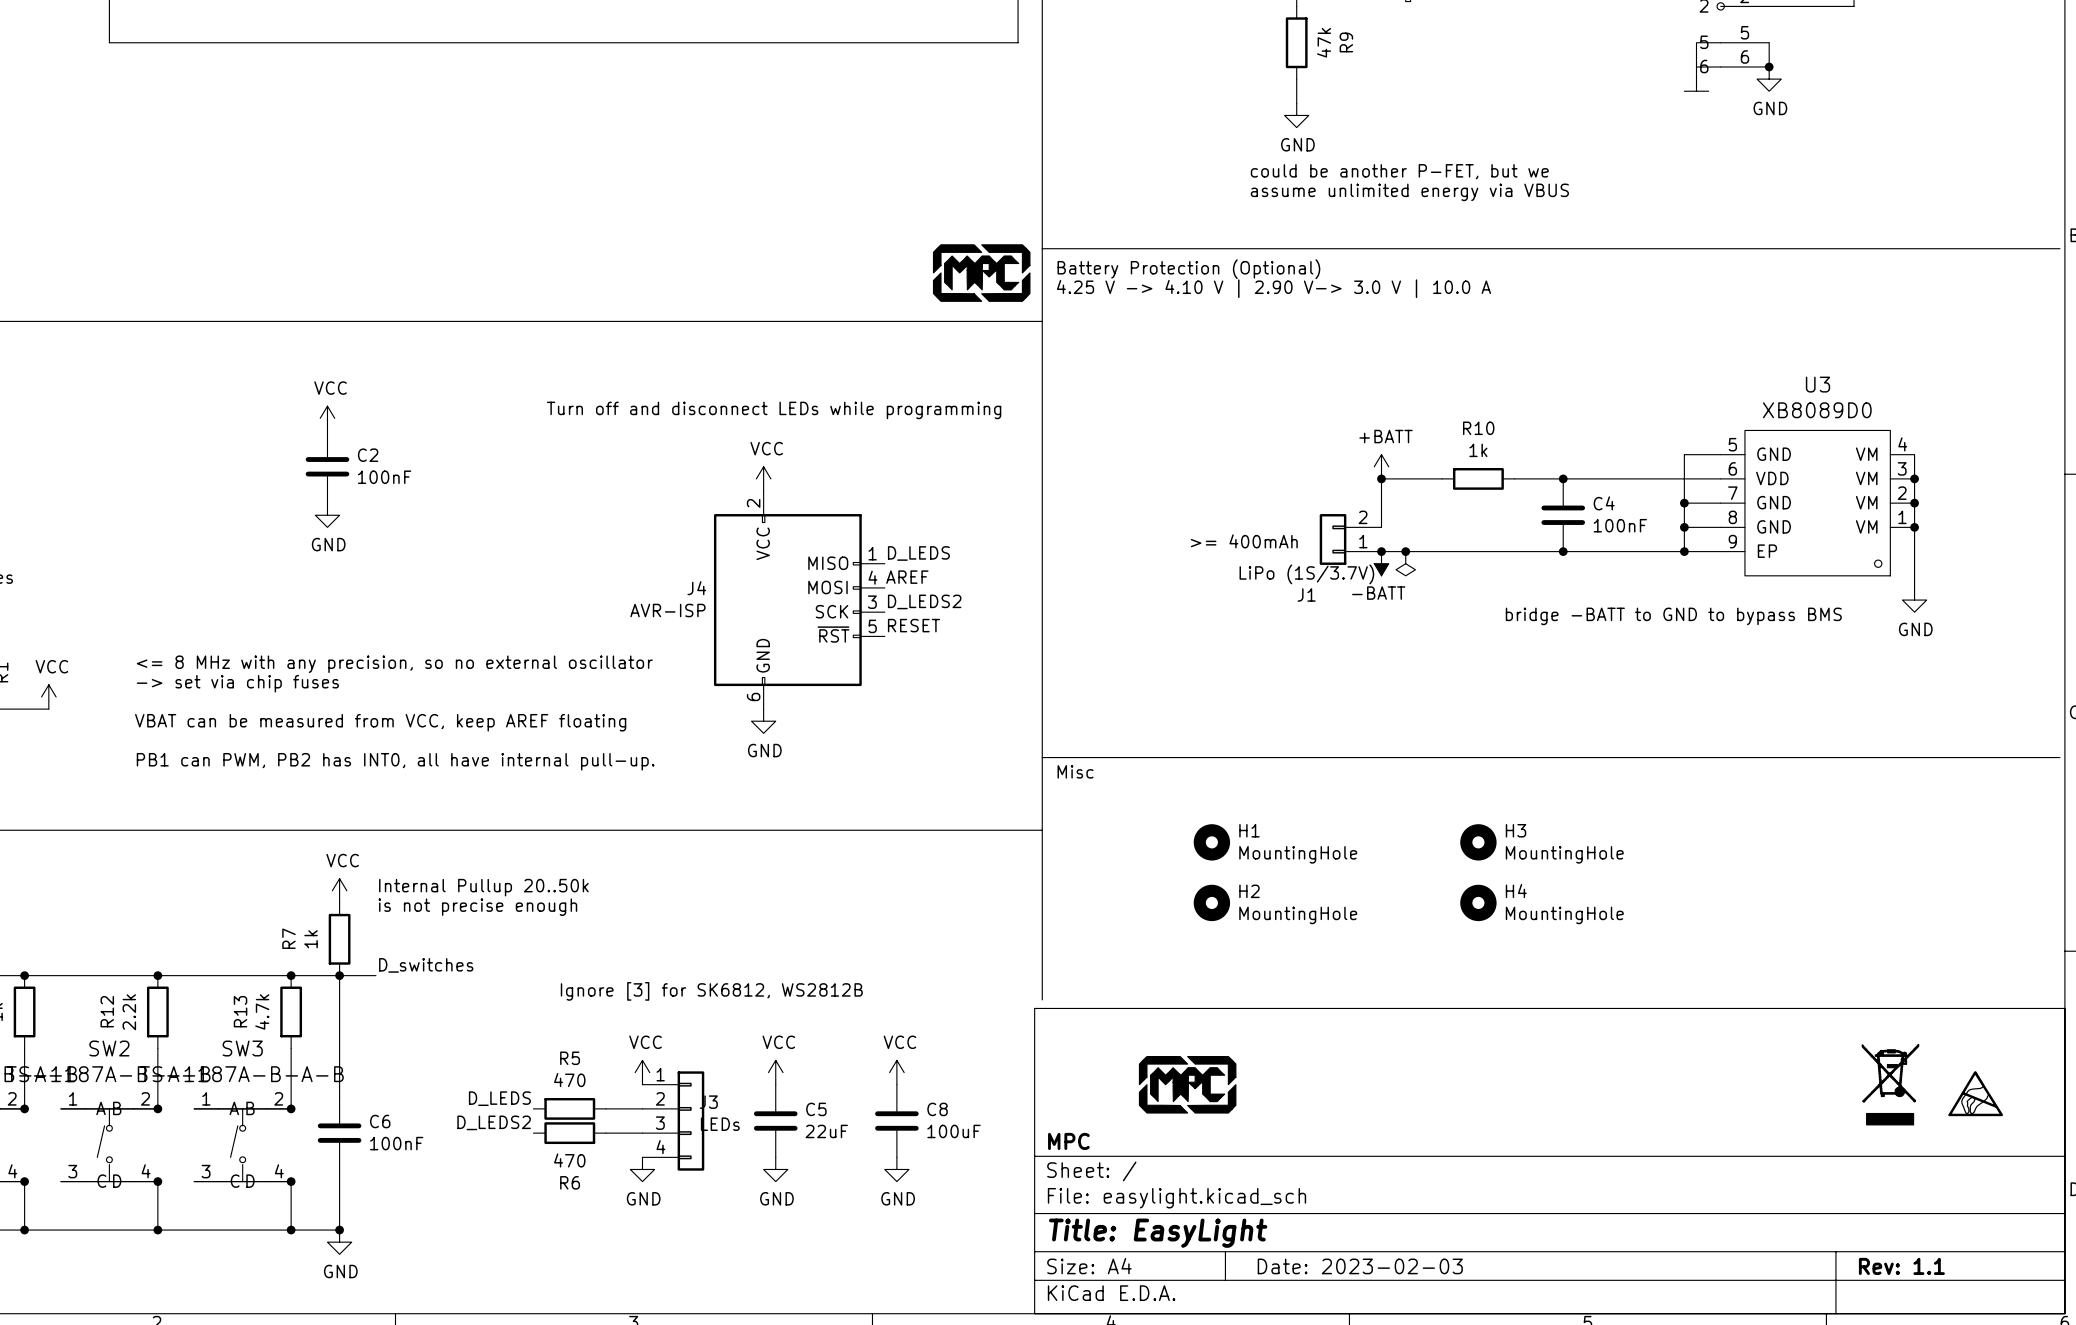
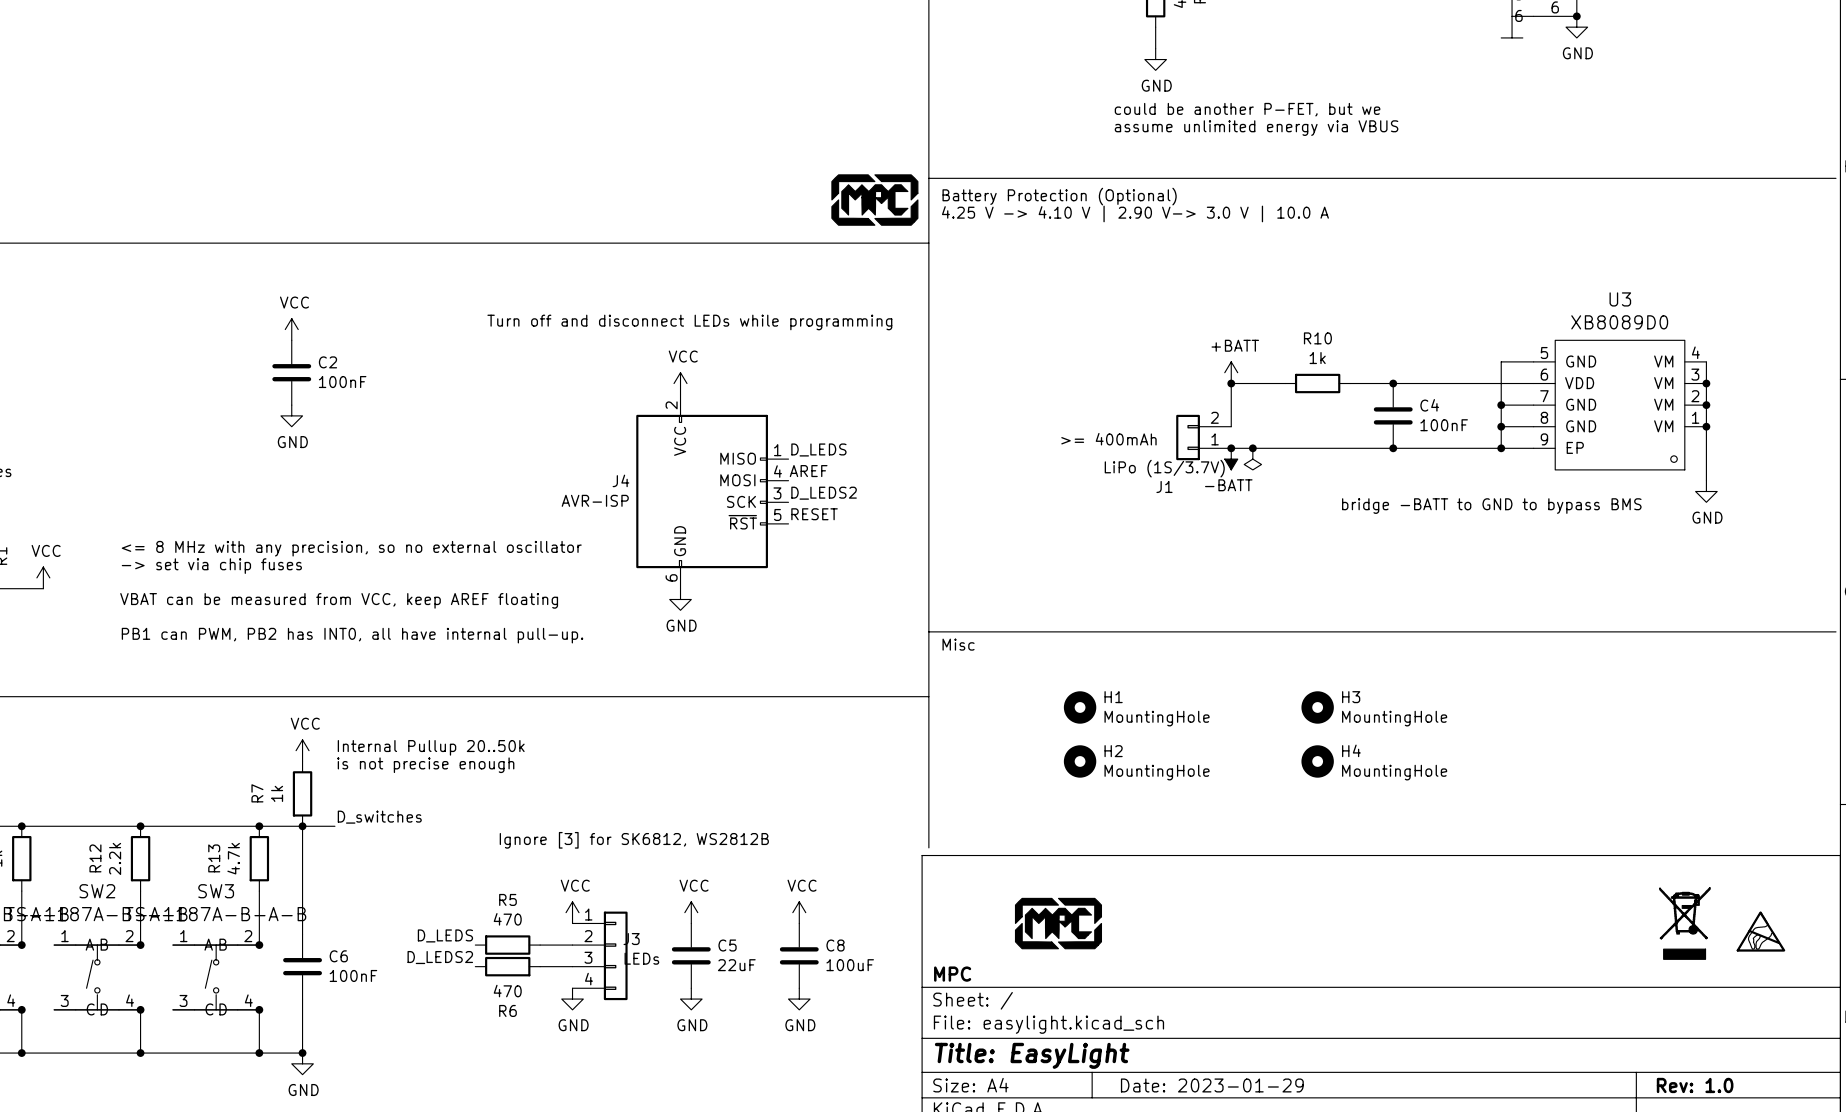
title block: Date: 2023-02-03 (1360, 1266) -> Date: 2023-01-29 (1212, 1085)
title block: Rev: 1.1 (1901, 1266) -> Rev: 1.0 (1695, 1085)

